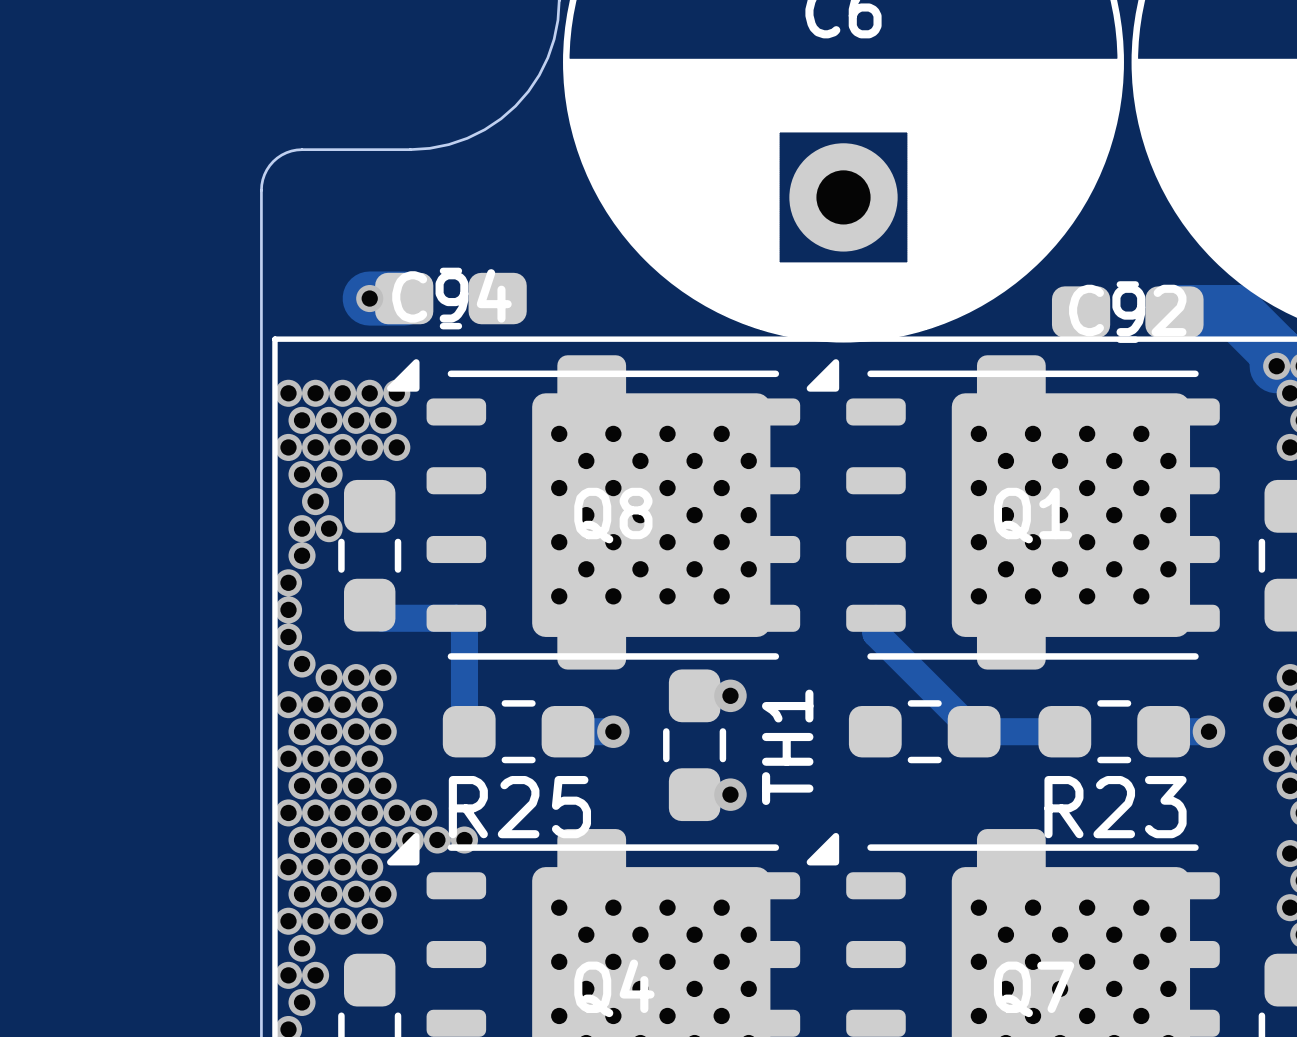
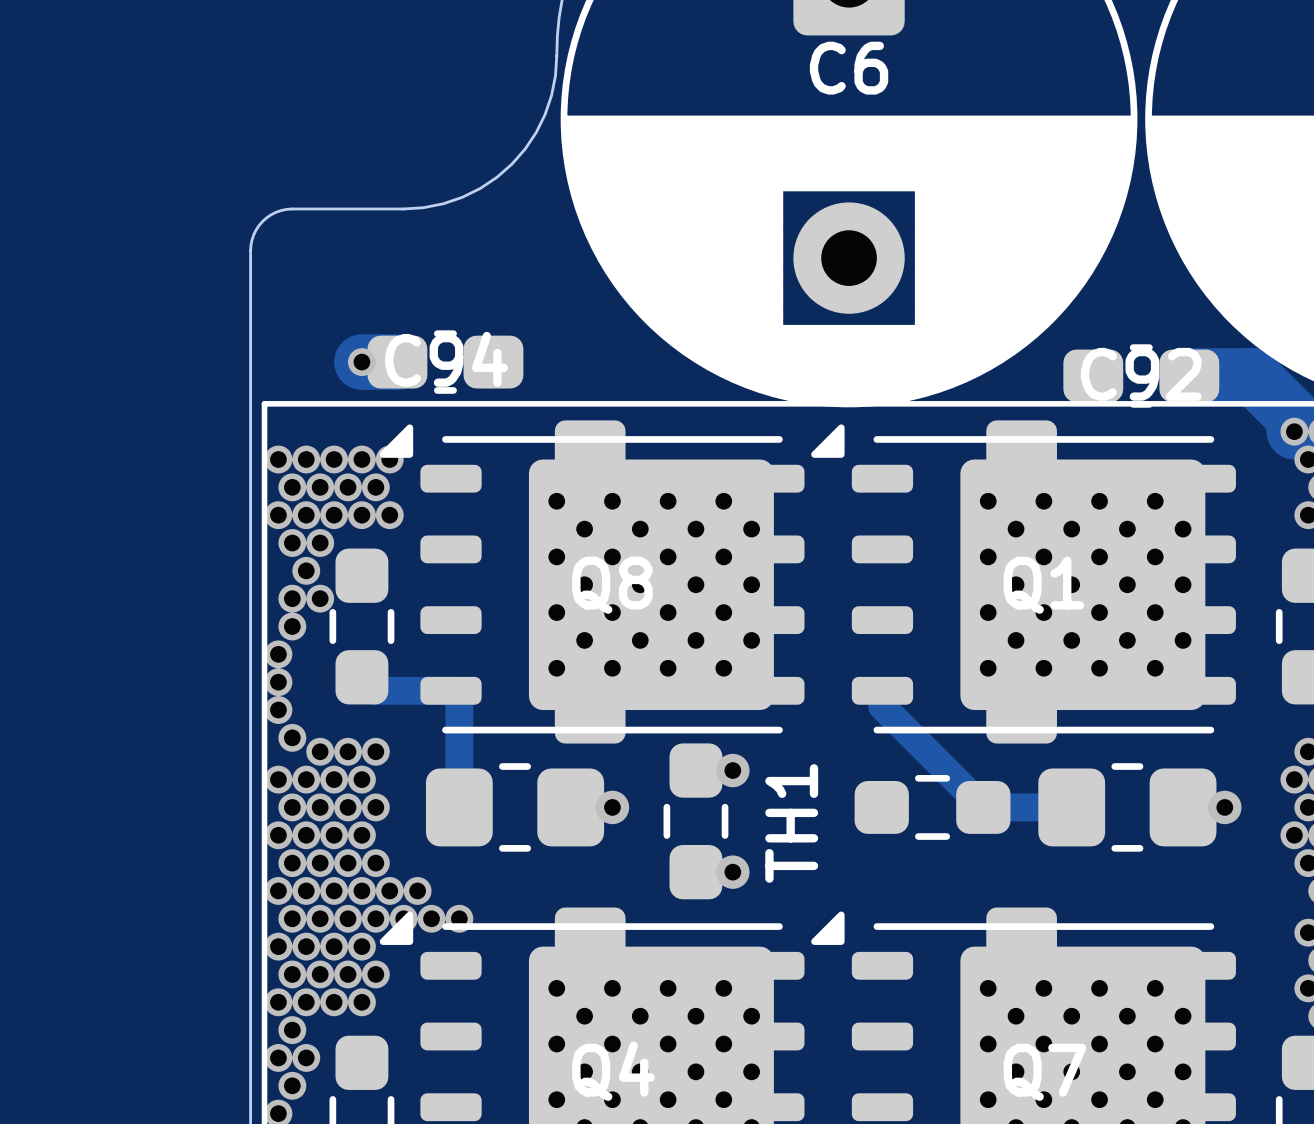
R25: (518, 731) -> none
part: none -> (515, 807)
R23: (1114, 731) -> none
part: none -> (1127, 807)

